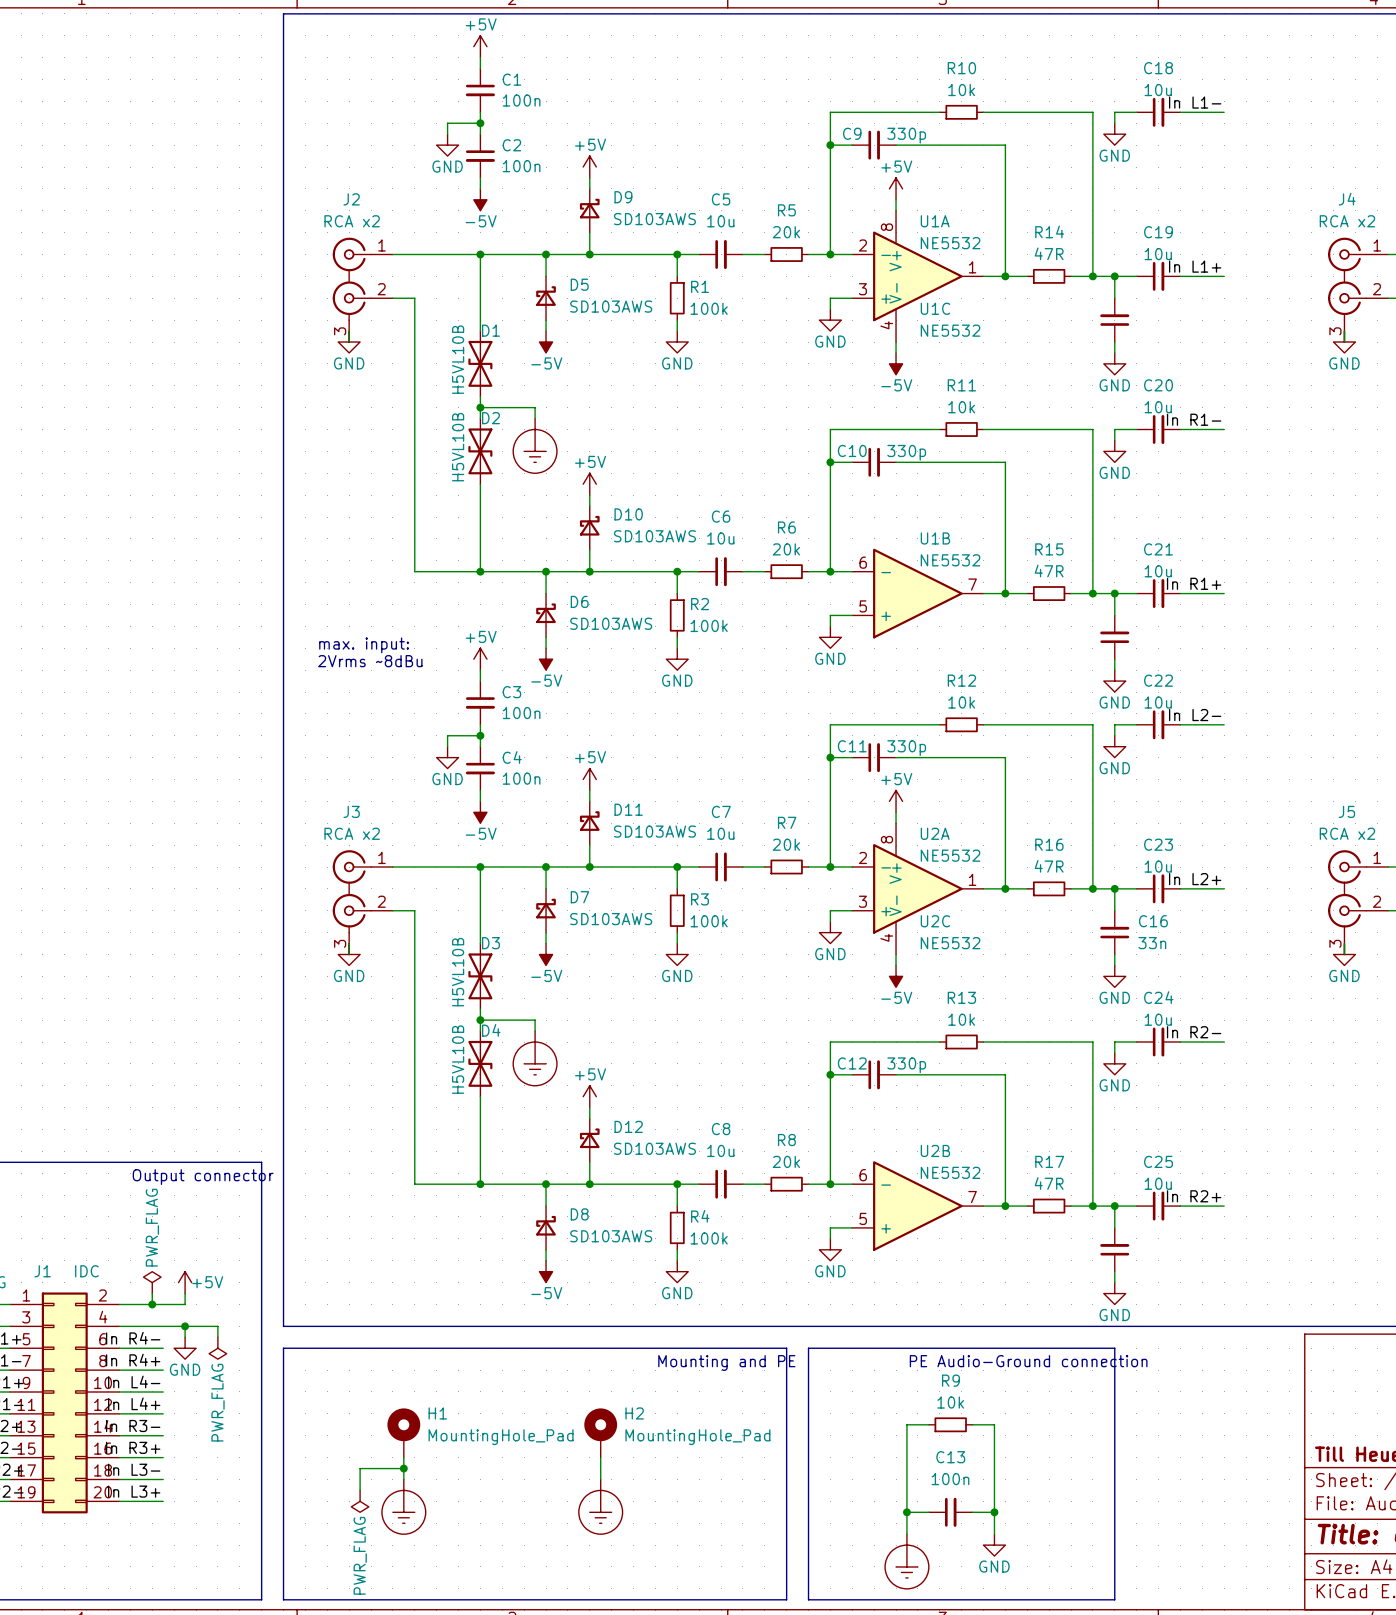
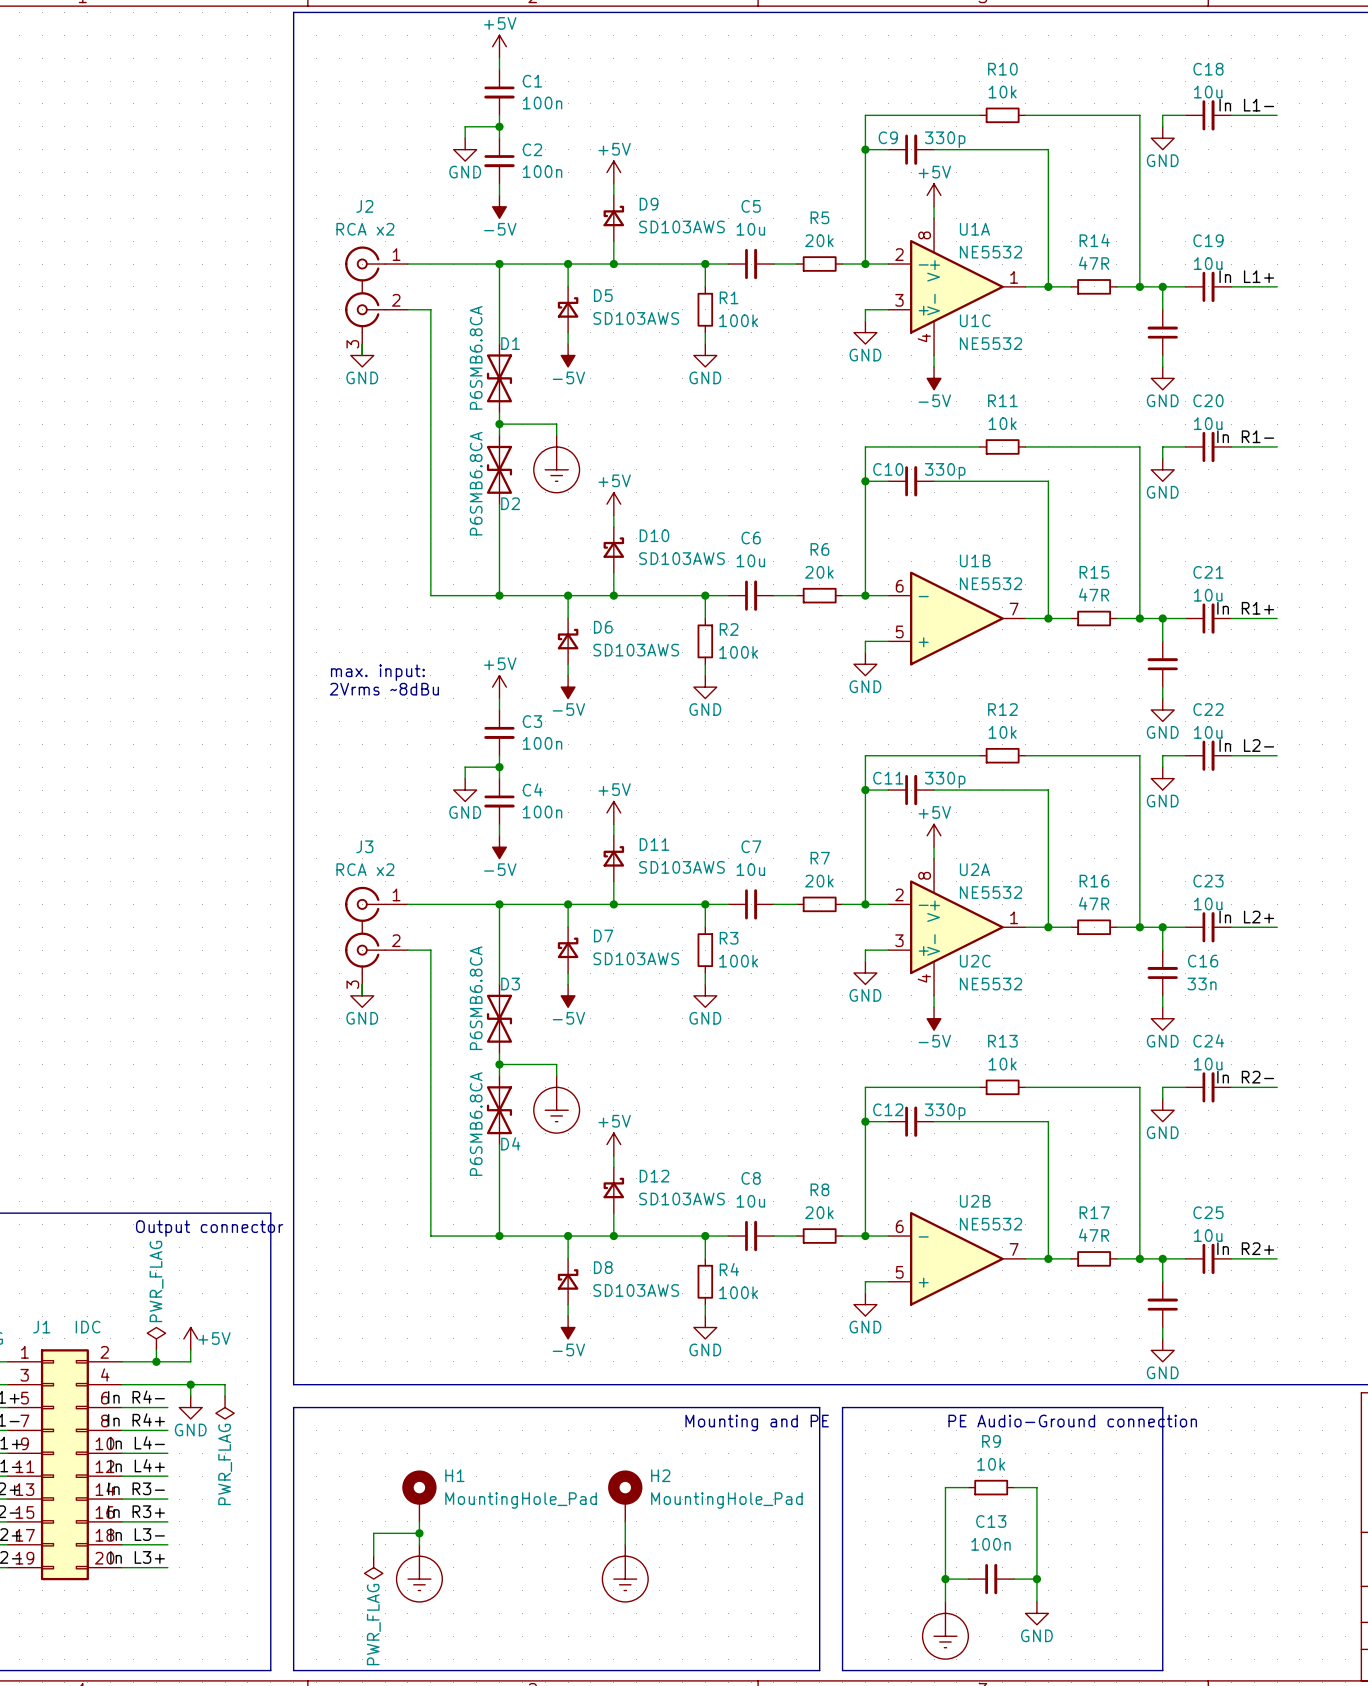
D1 value: H5VL10B (458, 359) -> P6SMB6.8CA (476, 357)
D2 name position: D2 (490, 418) -> D2 (510, 503)
D2 value: H5VL10B (458, 447) -> P6SMB6.8CA (476, 483)
D3 value: H5VL10B (458, 972) -> P6SMB6.8CA (476, 998)
D4 name position: D4 (491, 1030) -> D4 (510, 1143)
D4 value: H5VL10B (458, 1059) -> P6SMB6.8CA (476, 1124)

